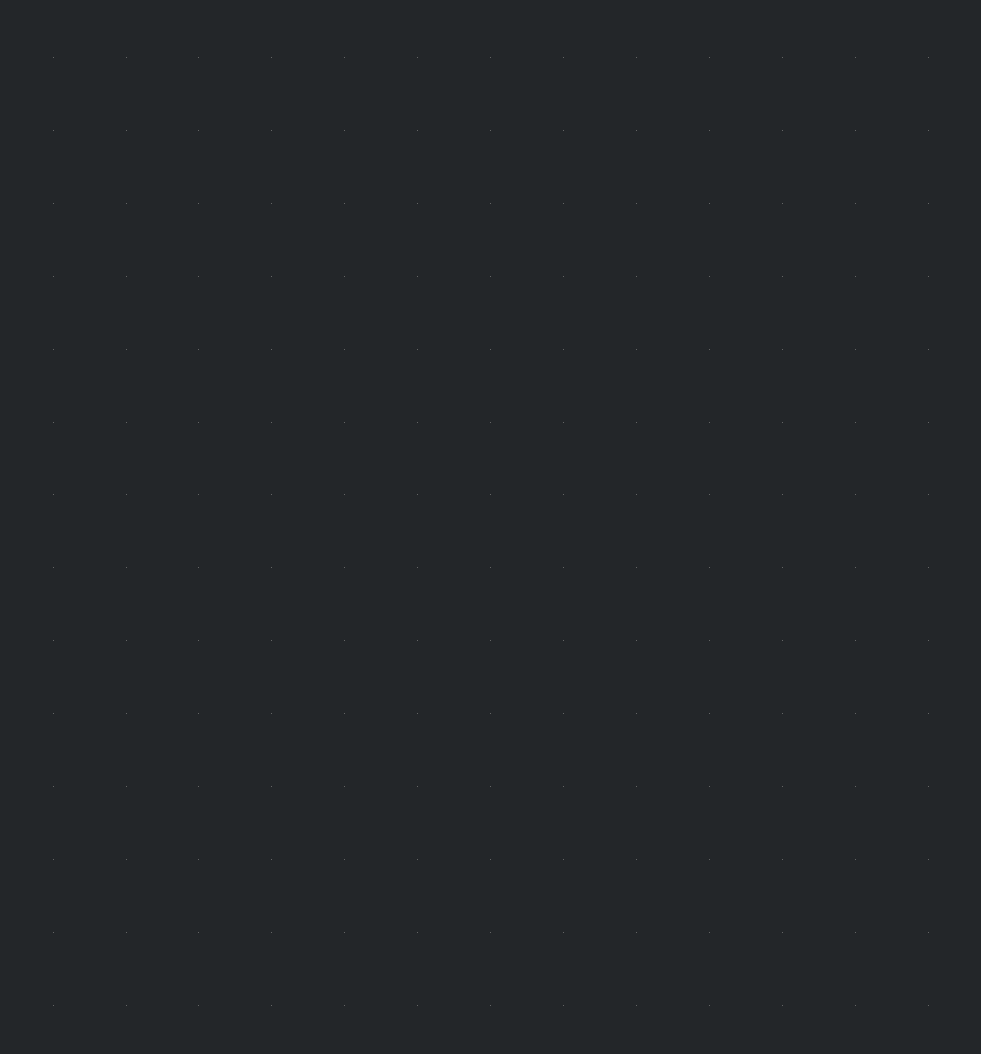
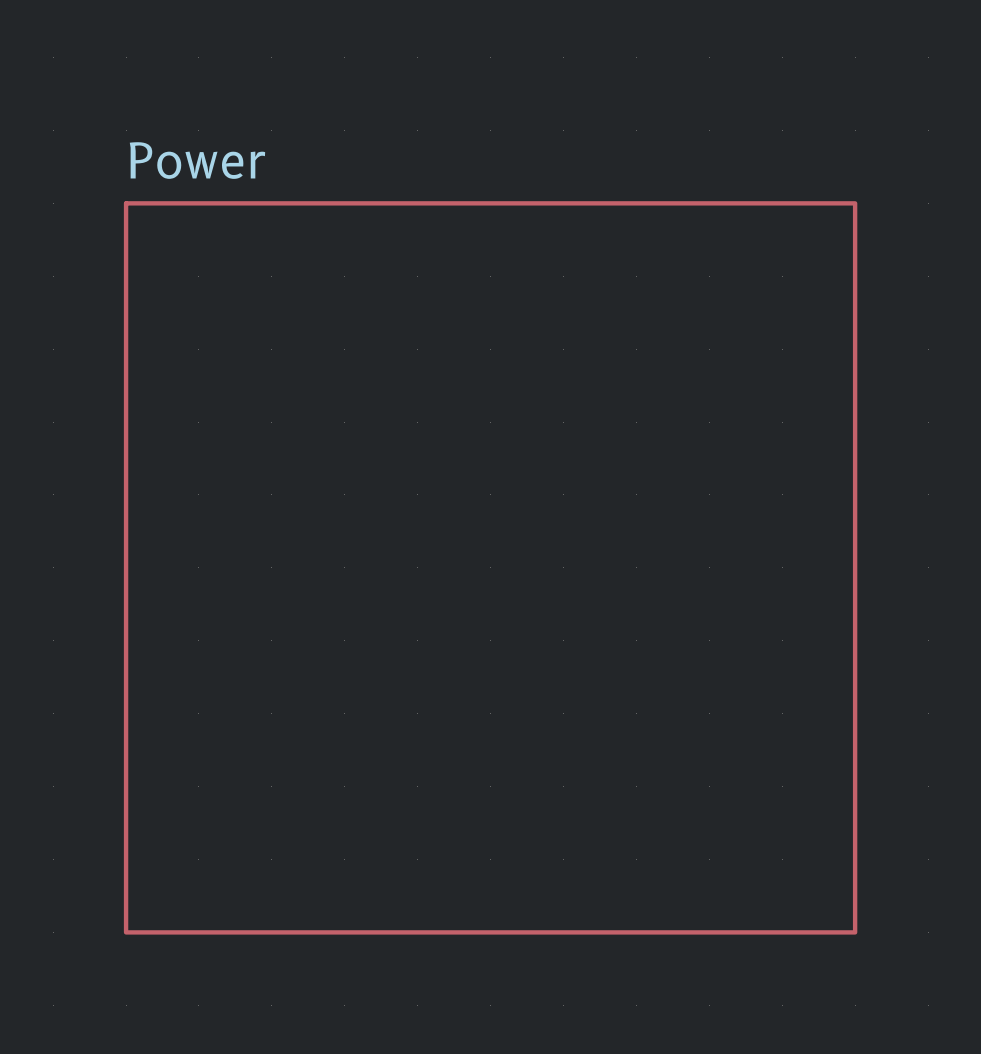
sheet Power: none -> (490, 567)

